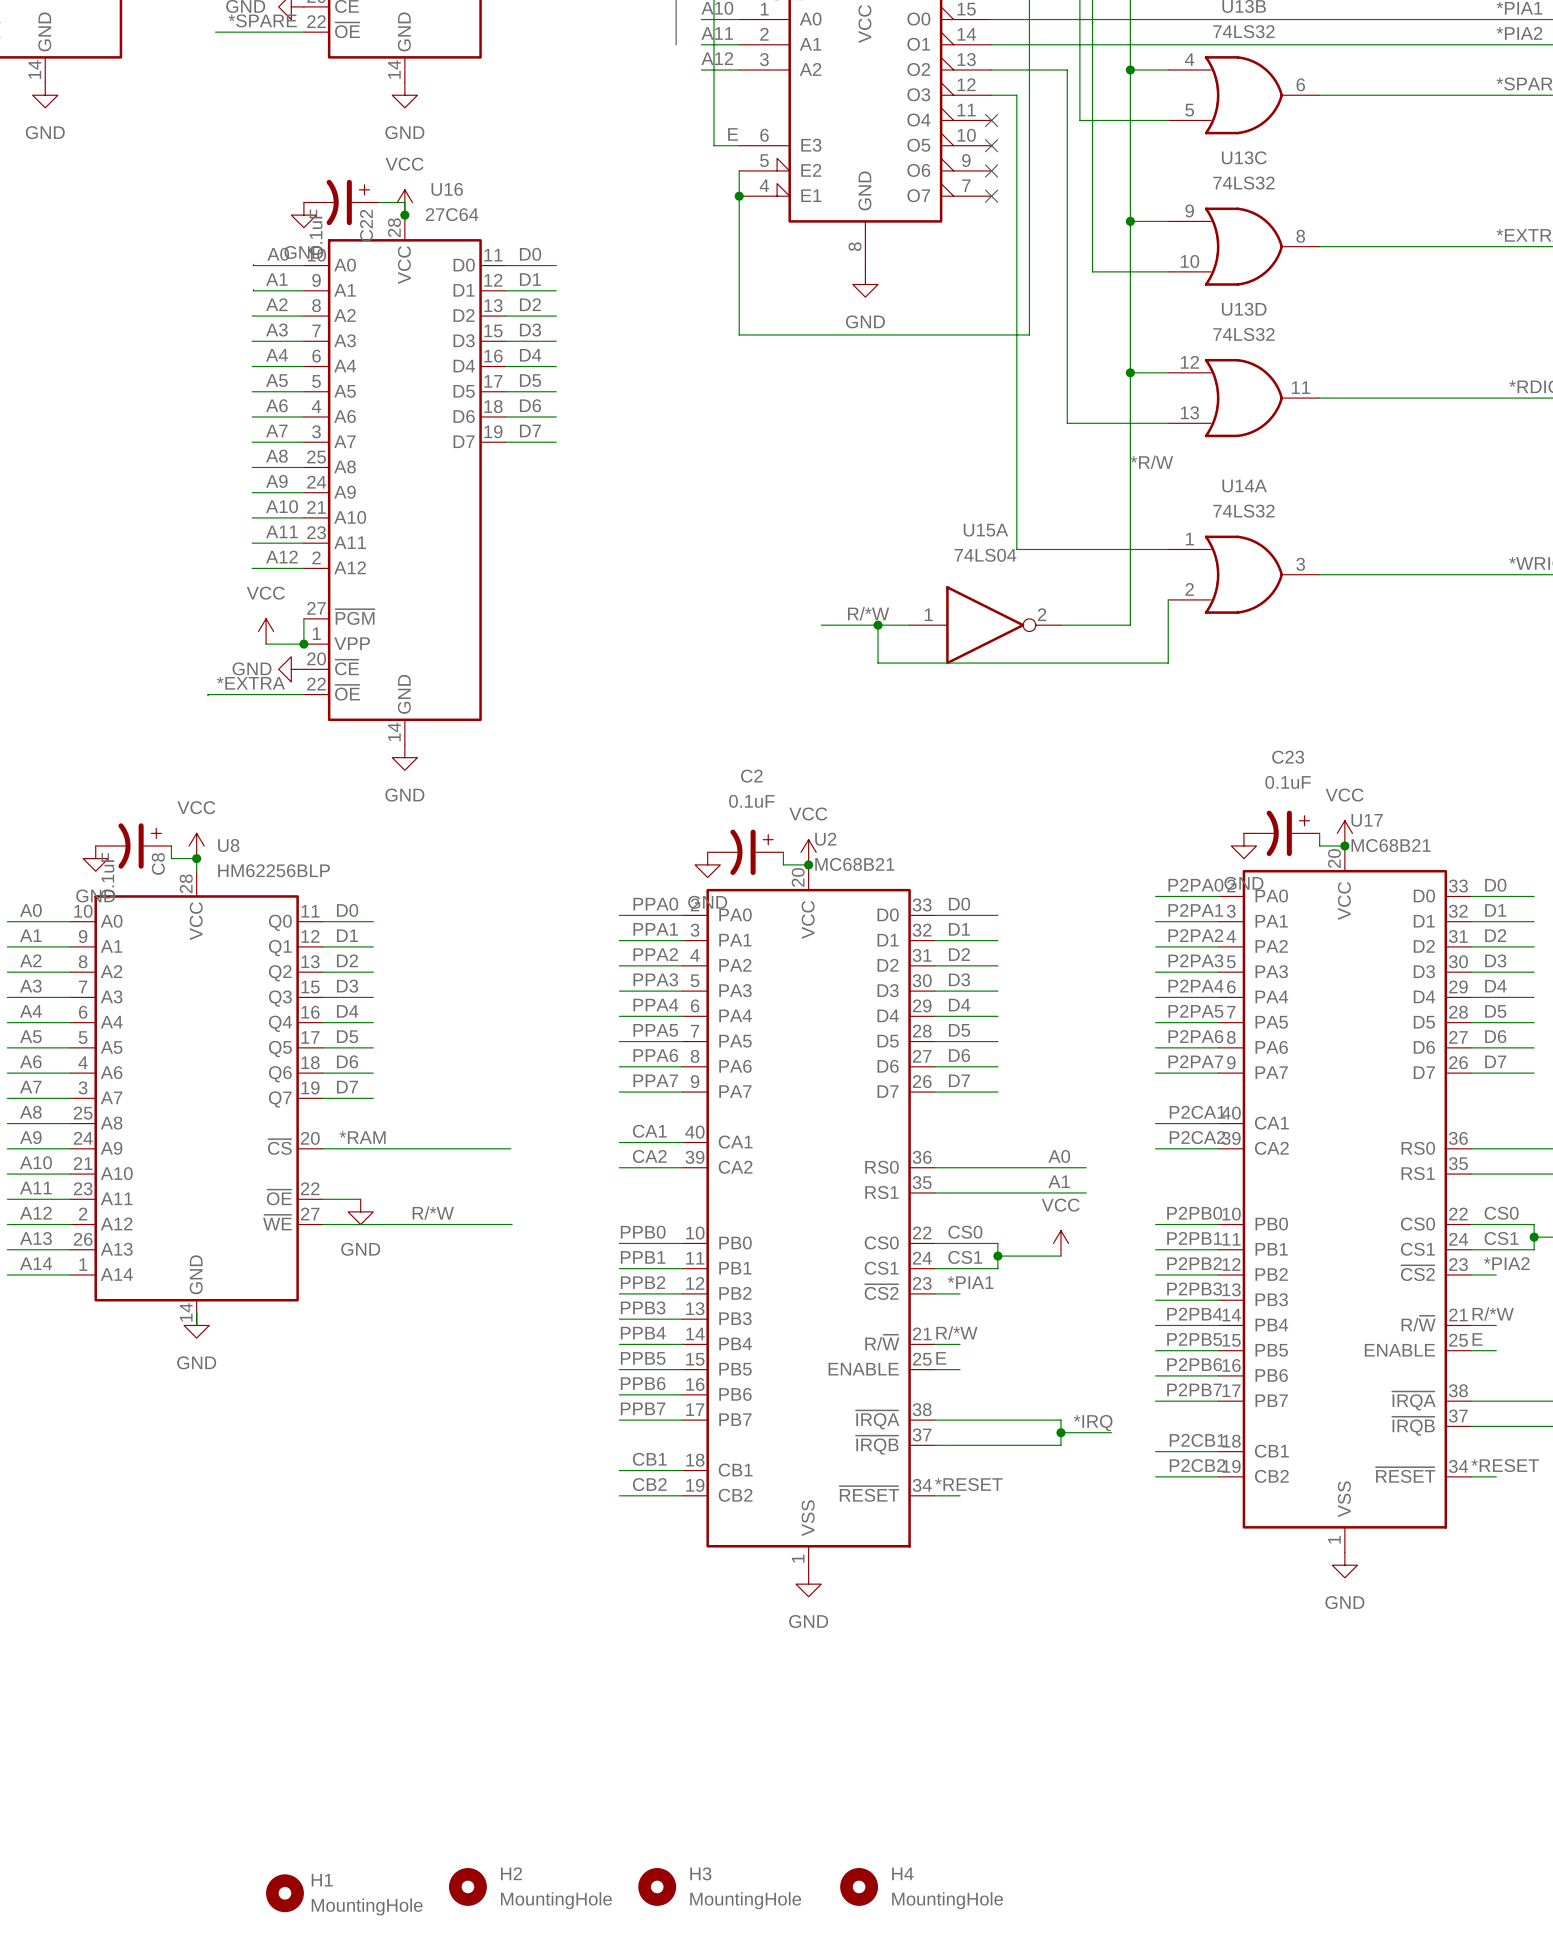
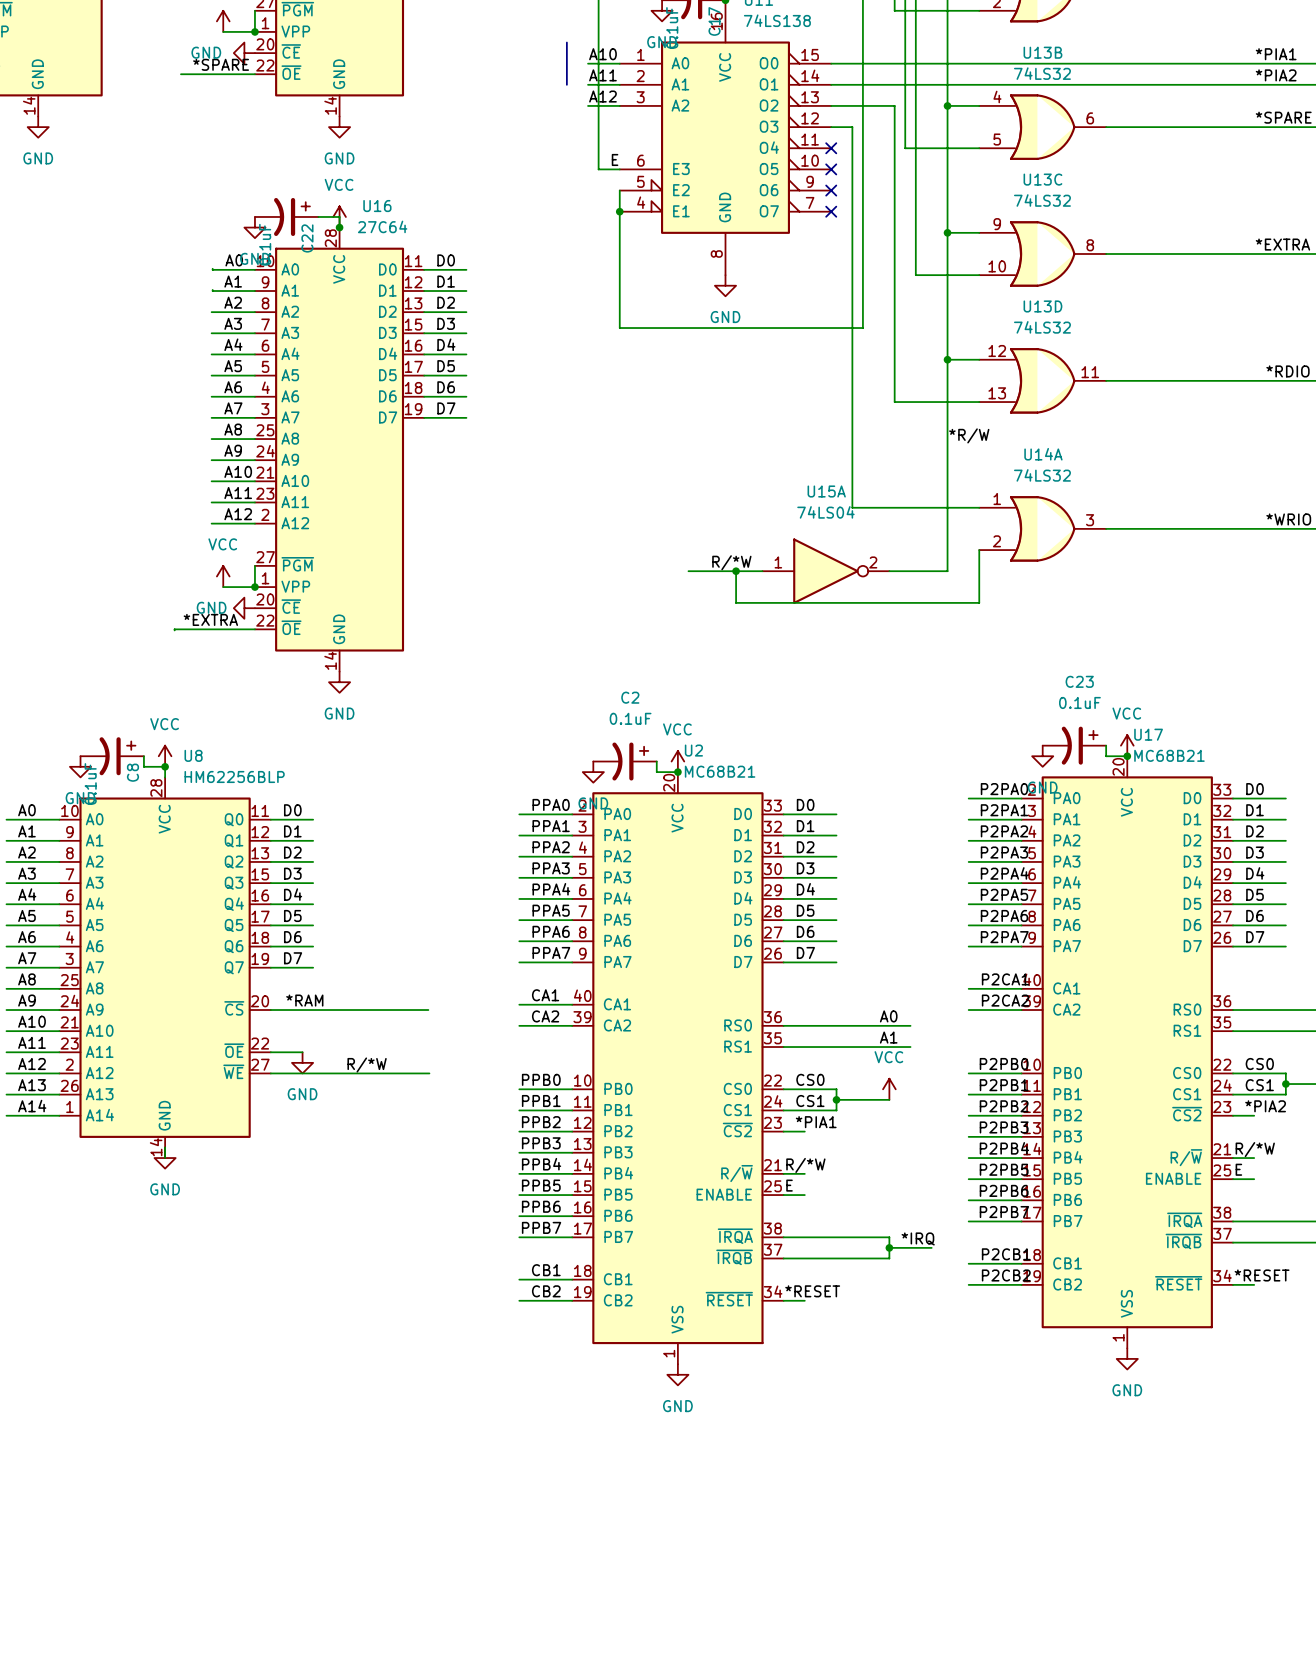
H2: MountingHole (467, 1886) -> none
H3: MountingHole (657, 1886) -> none
H4: MountingHole (859, 1886) -> none
H1: MountingHole (284, 1893) -> none

